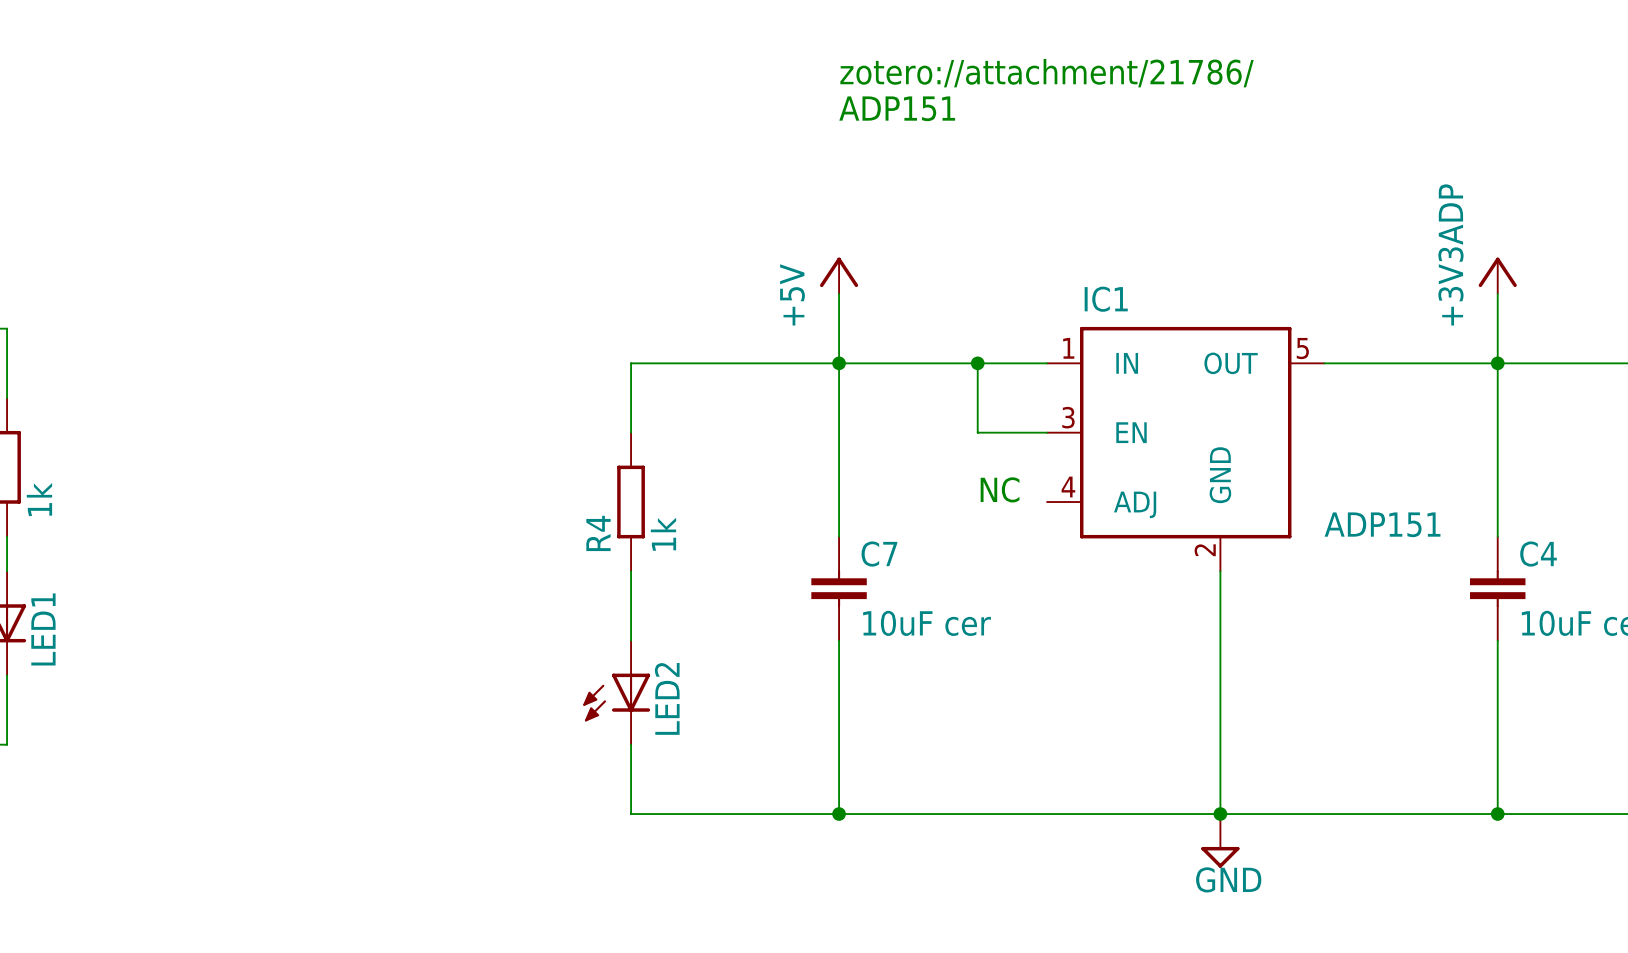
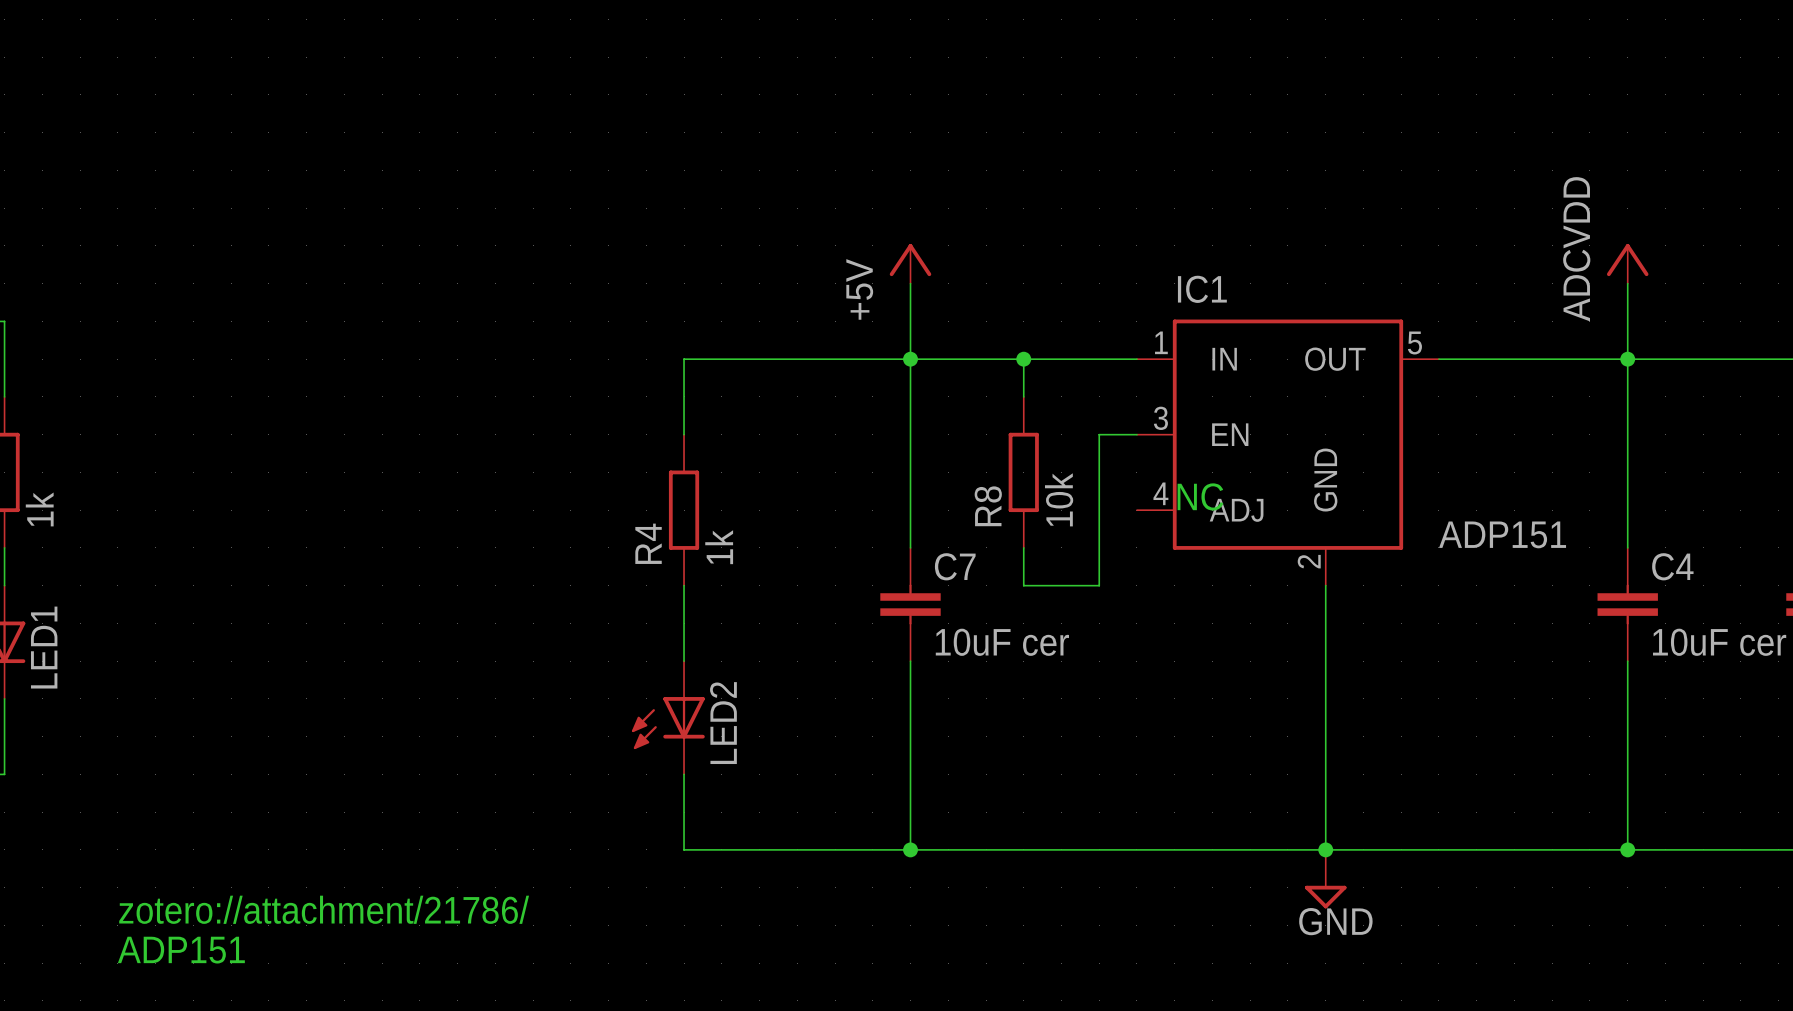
text: zotero://attachment/21786/ (1047, 73) -> none
text: ADP151 (897, 108) -> none
power symbol: +3V3ADP (1497, 275) -> ADCVDD (1627, 263)
wire: none -> (1023, 359) (1023, 396)
wire: (977, 363) (977, 432) (1012, 432) -> (1023, 547) (1023, 585) (1099, 585) (1099, 434)
junction position: (977, 363) -> (1023, 359)
R8: none -> 10k (1023, 472)
text position: NC (1000, 489) -> NC (1200, 496)
text: none -> zotero://attachment/21786/ (324, 909)
text: none -> ADP151 (181, 950)

